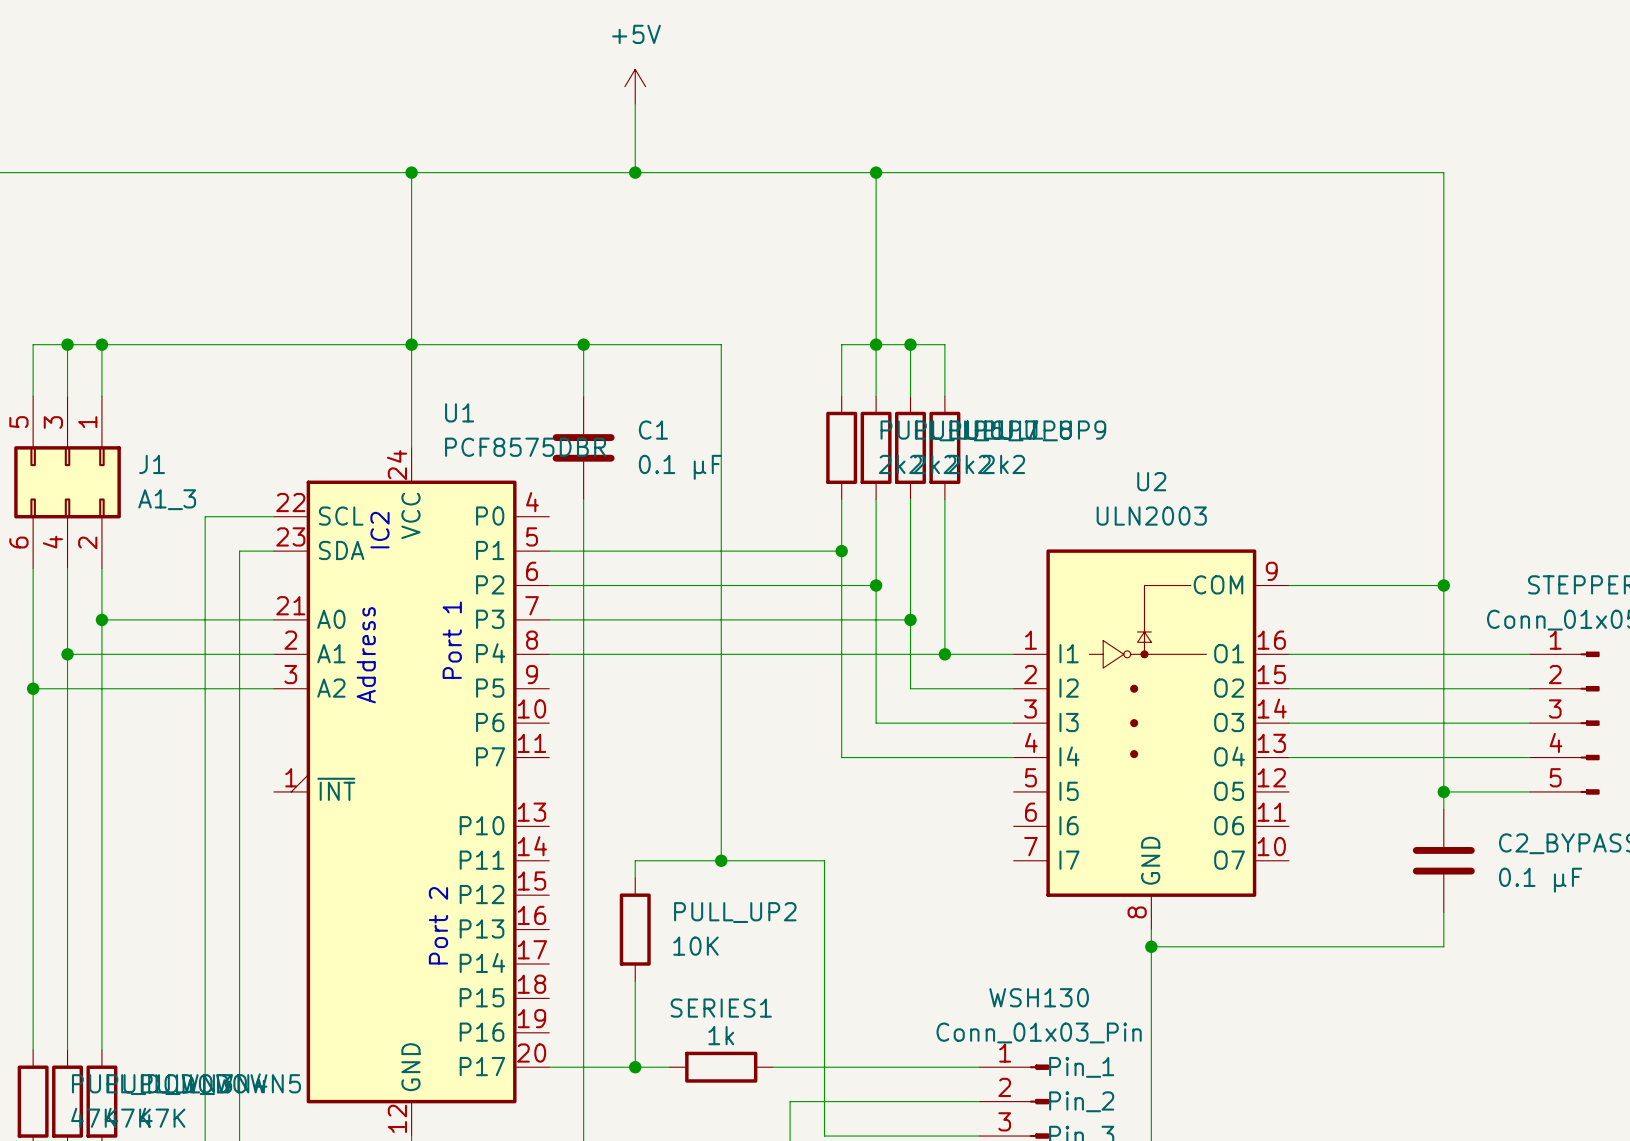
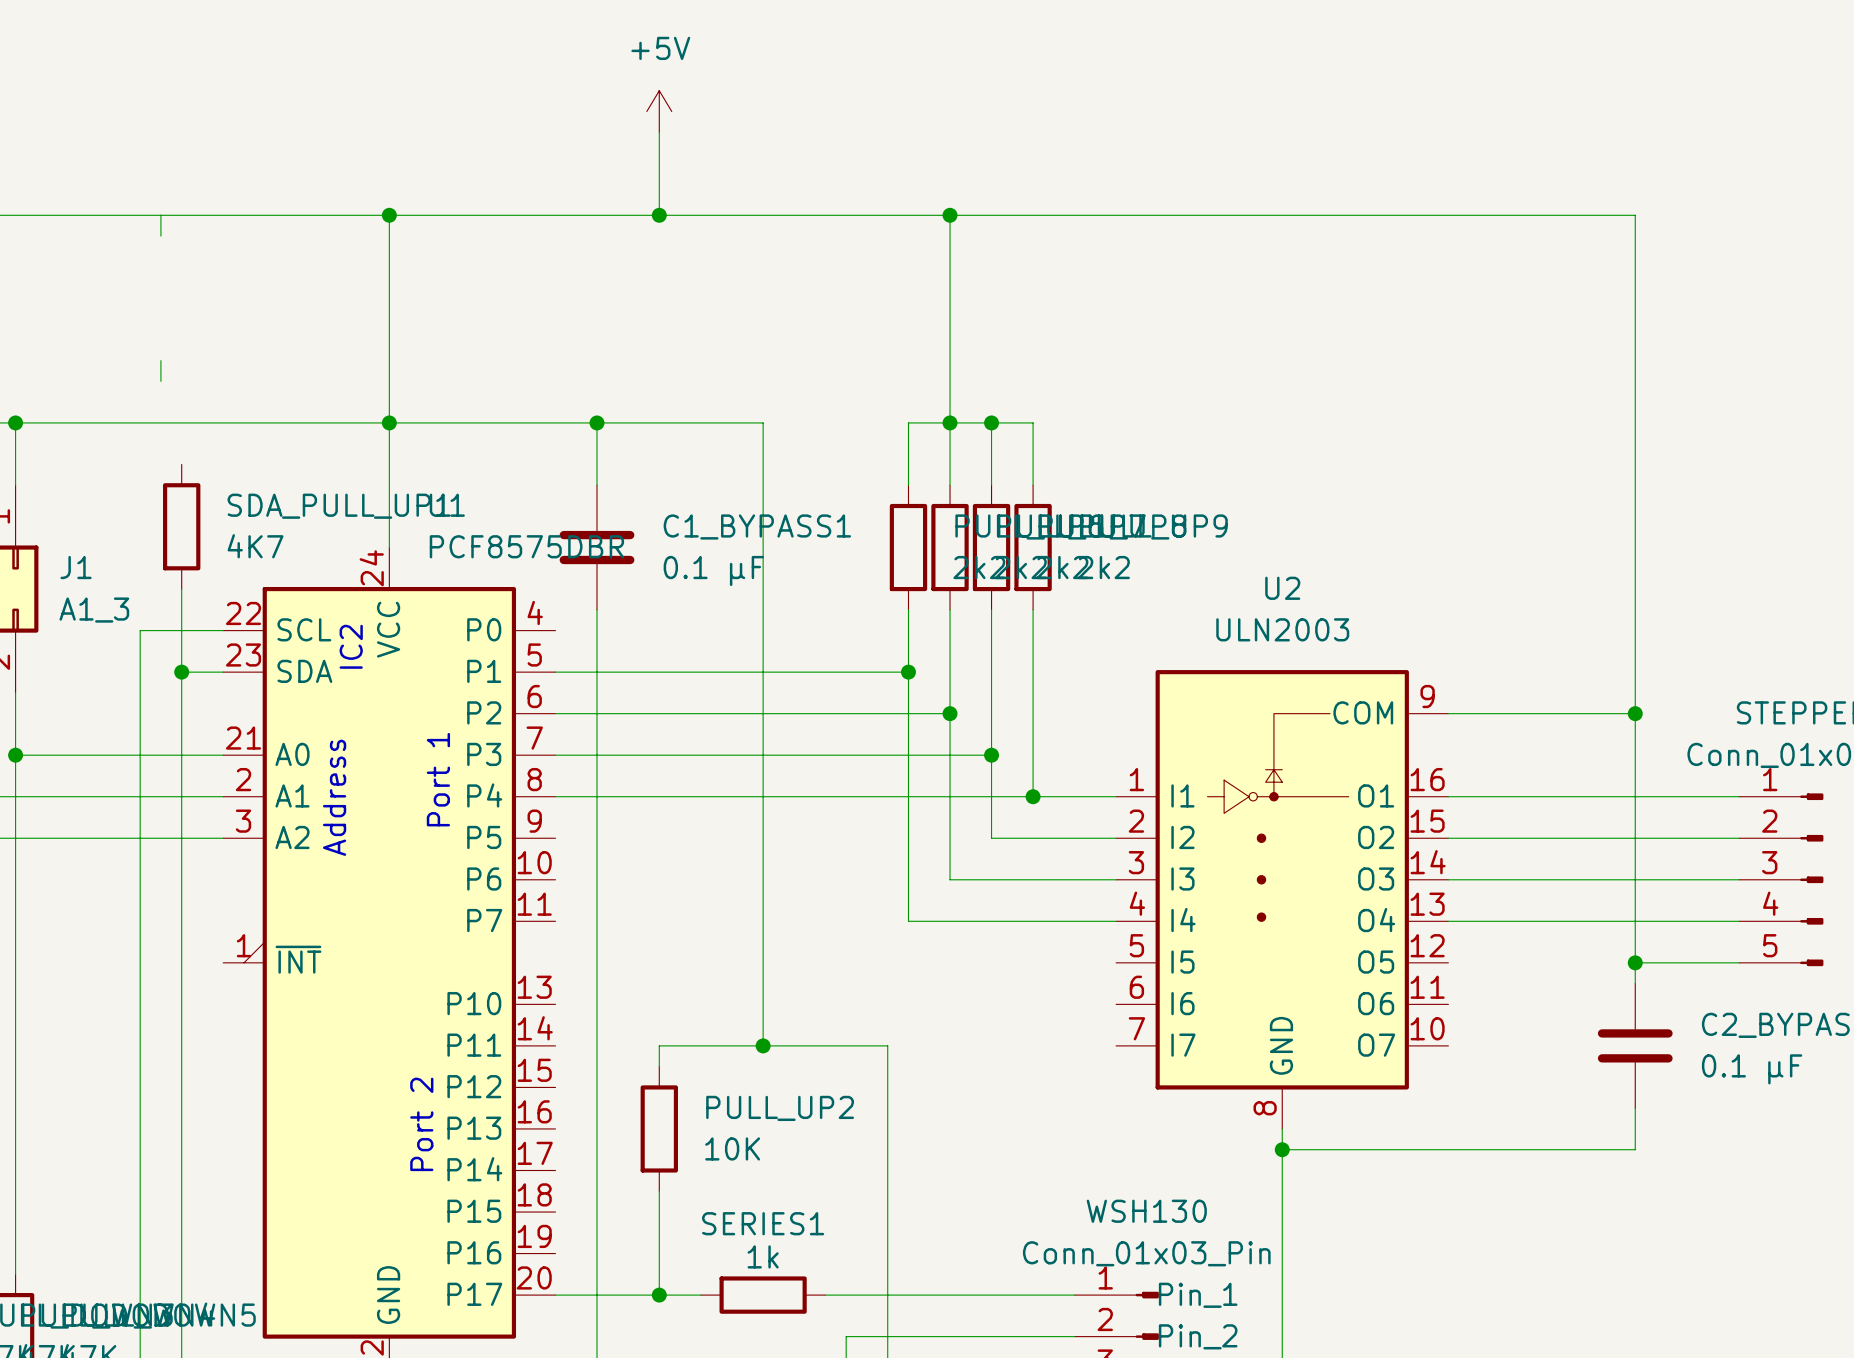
wire: none -> (160, 215) (160, 236)
wire: none -> (160, 360) (160, 381)
SDA_PULL_UP1: none -> 4K7 (181, 526)
C1 name: C1 (653, 430) -> C1_BYPASS1 (757, 526)
wire: none -> (181, 589) (181, 672)
junction: none -> (181, 672)

